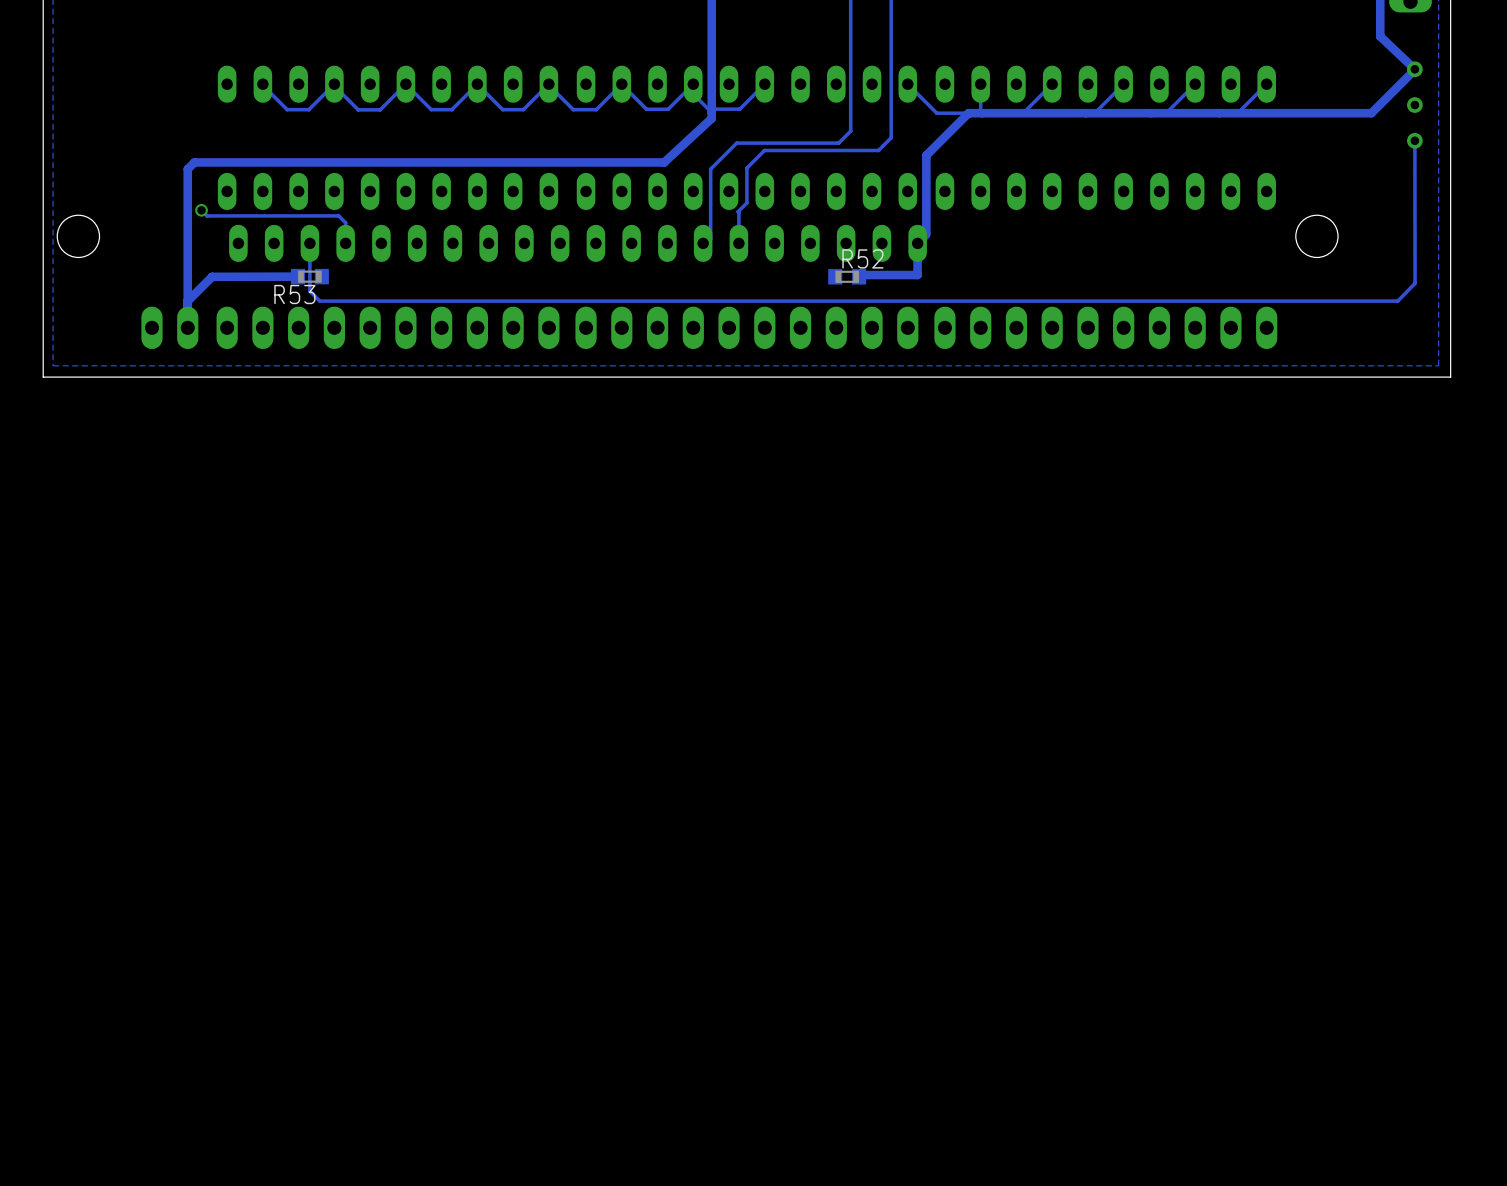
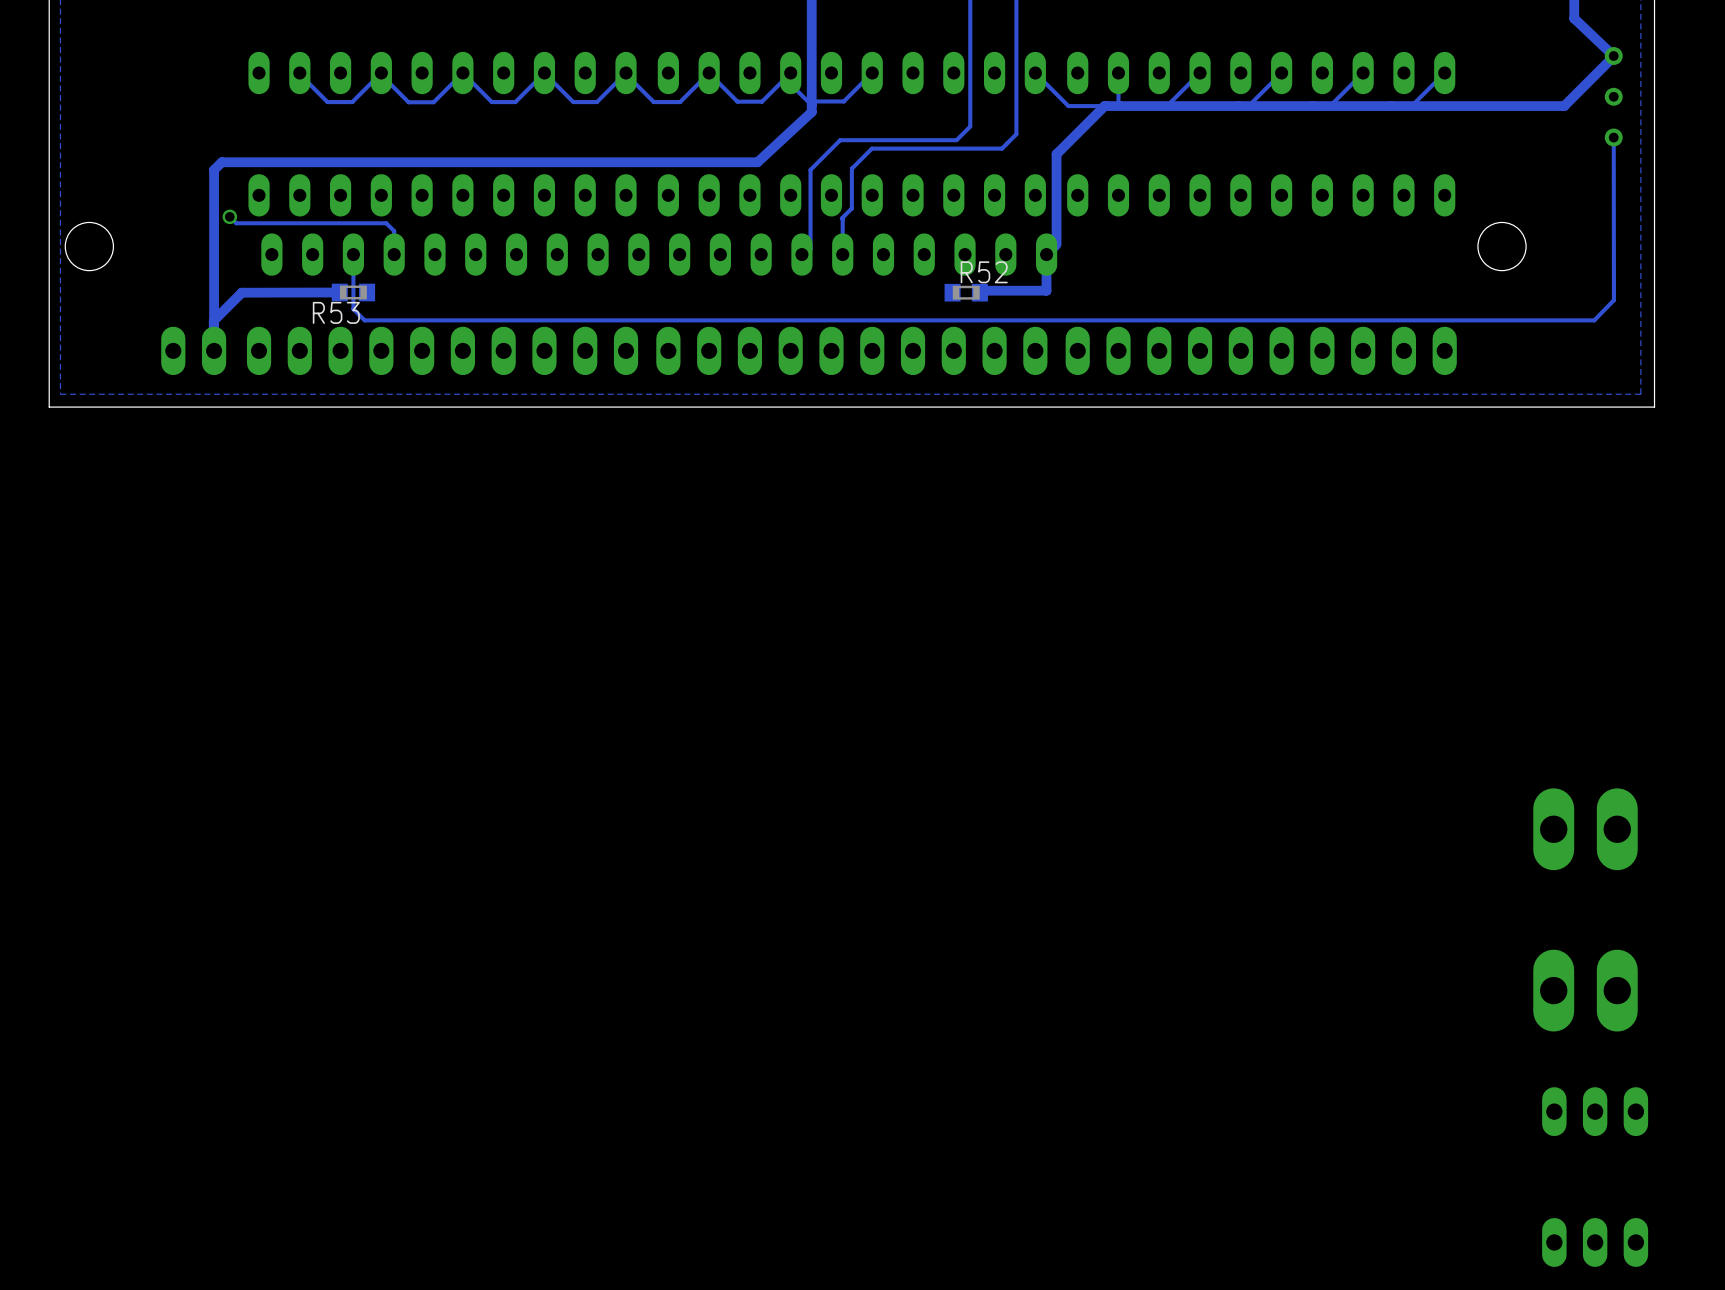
part: none -> (1585, 829)
part: none -> (1585, 990)
part: none -> (1595, 1111)
part: none -> (1595, 1242)

